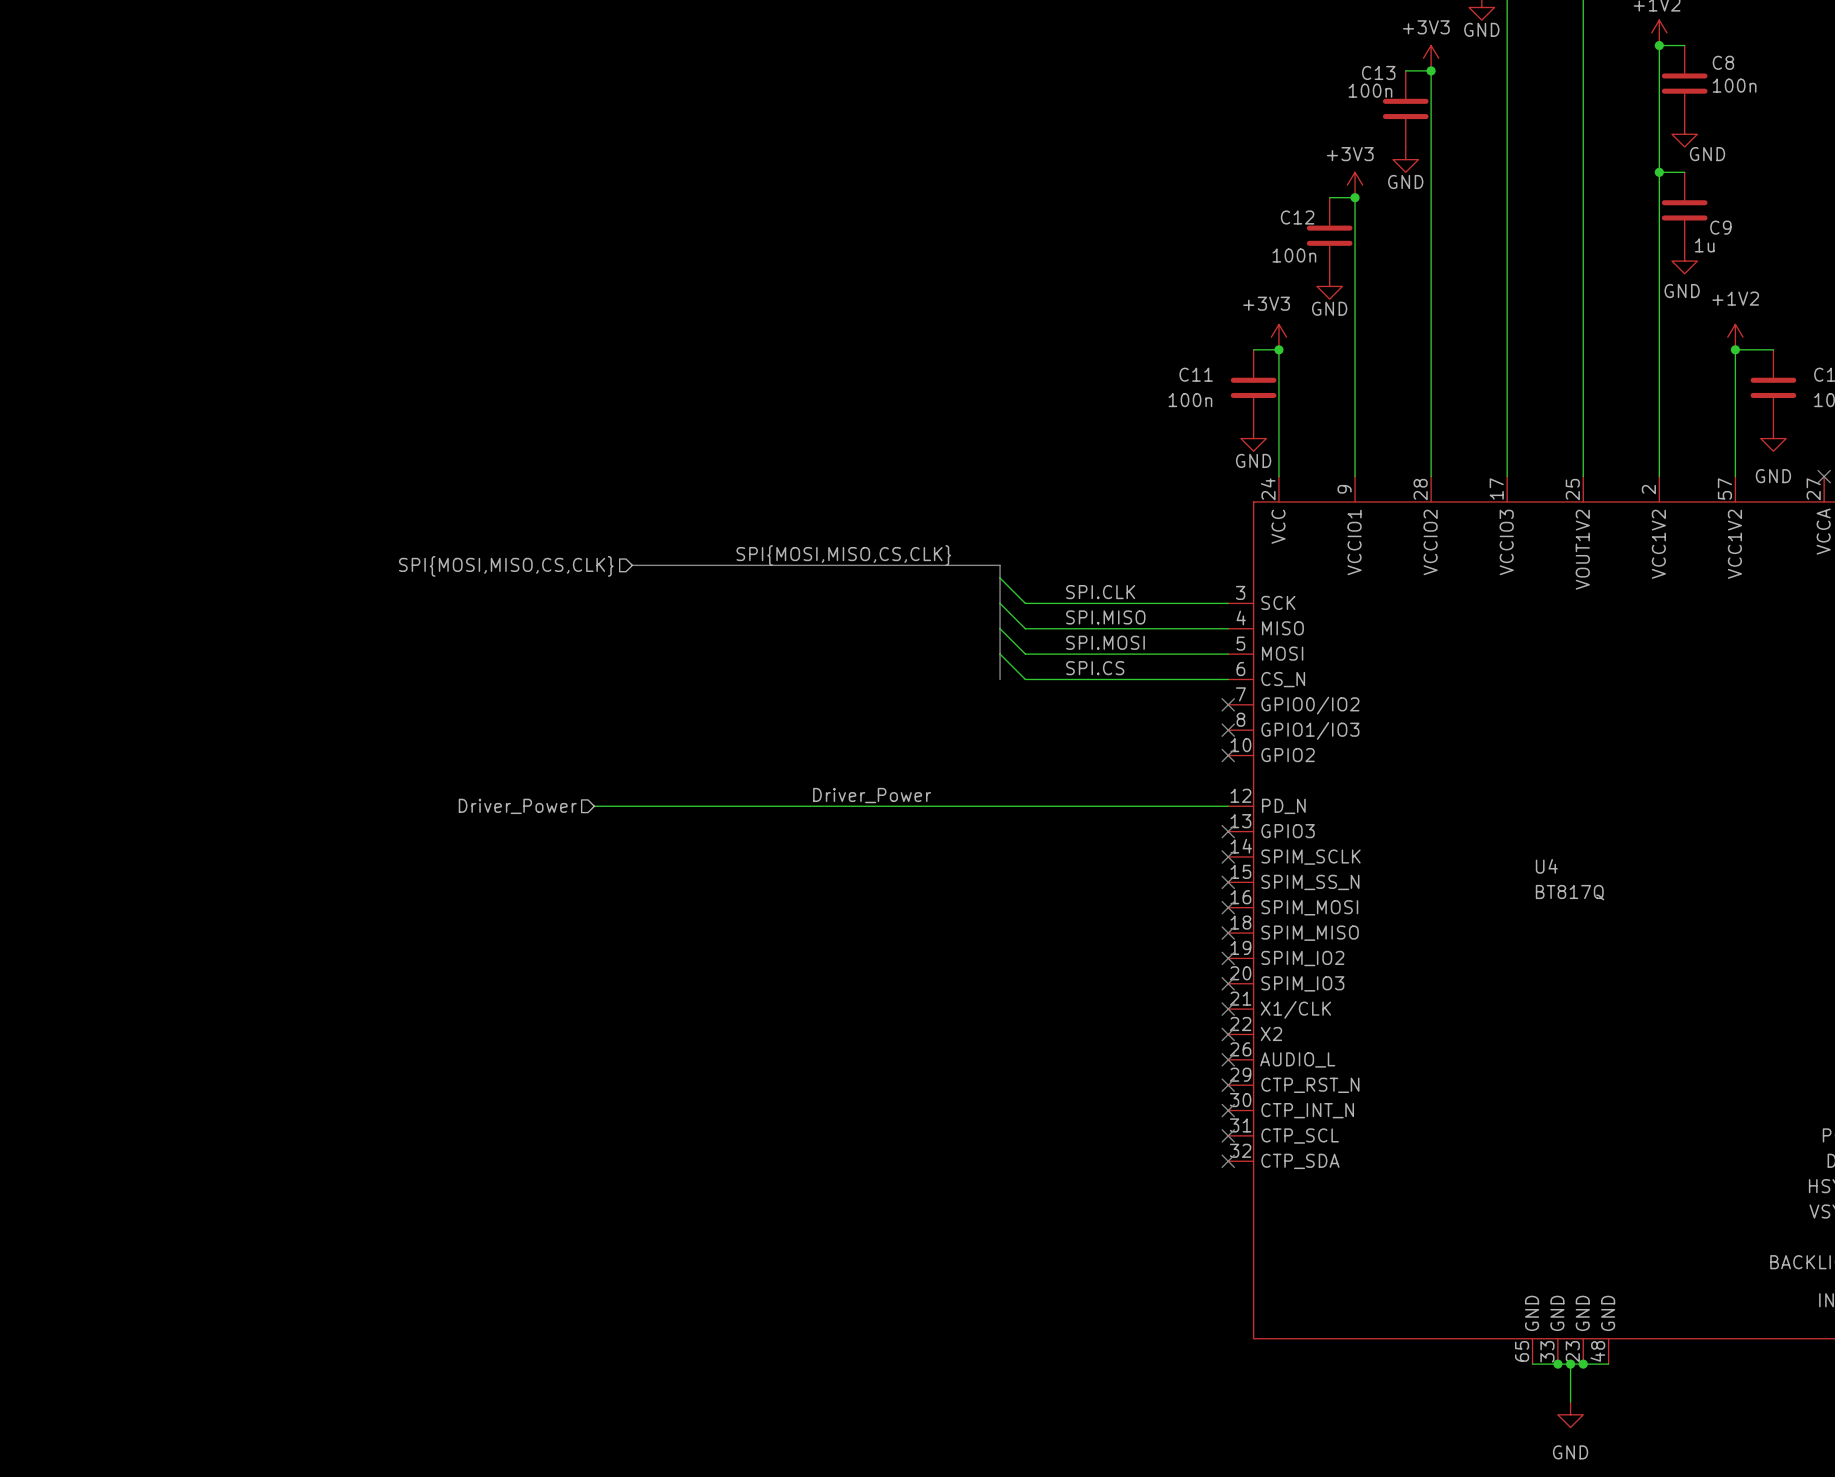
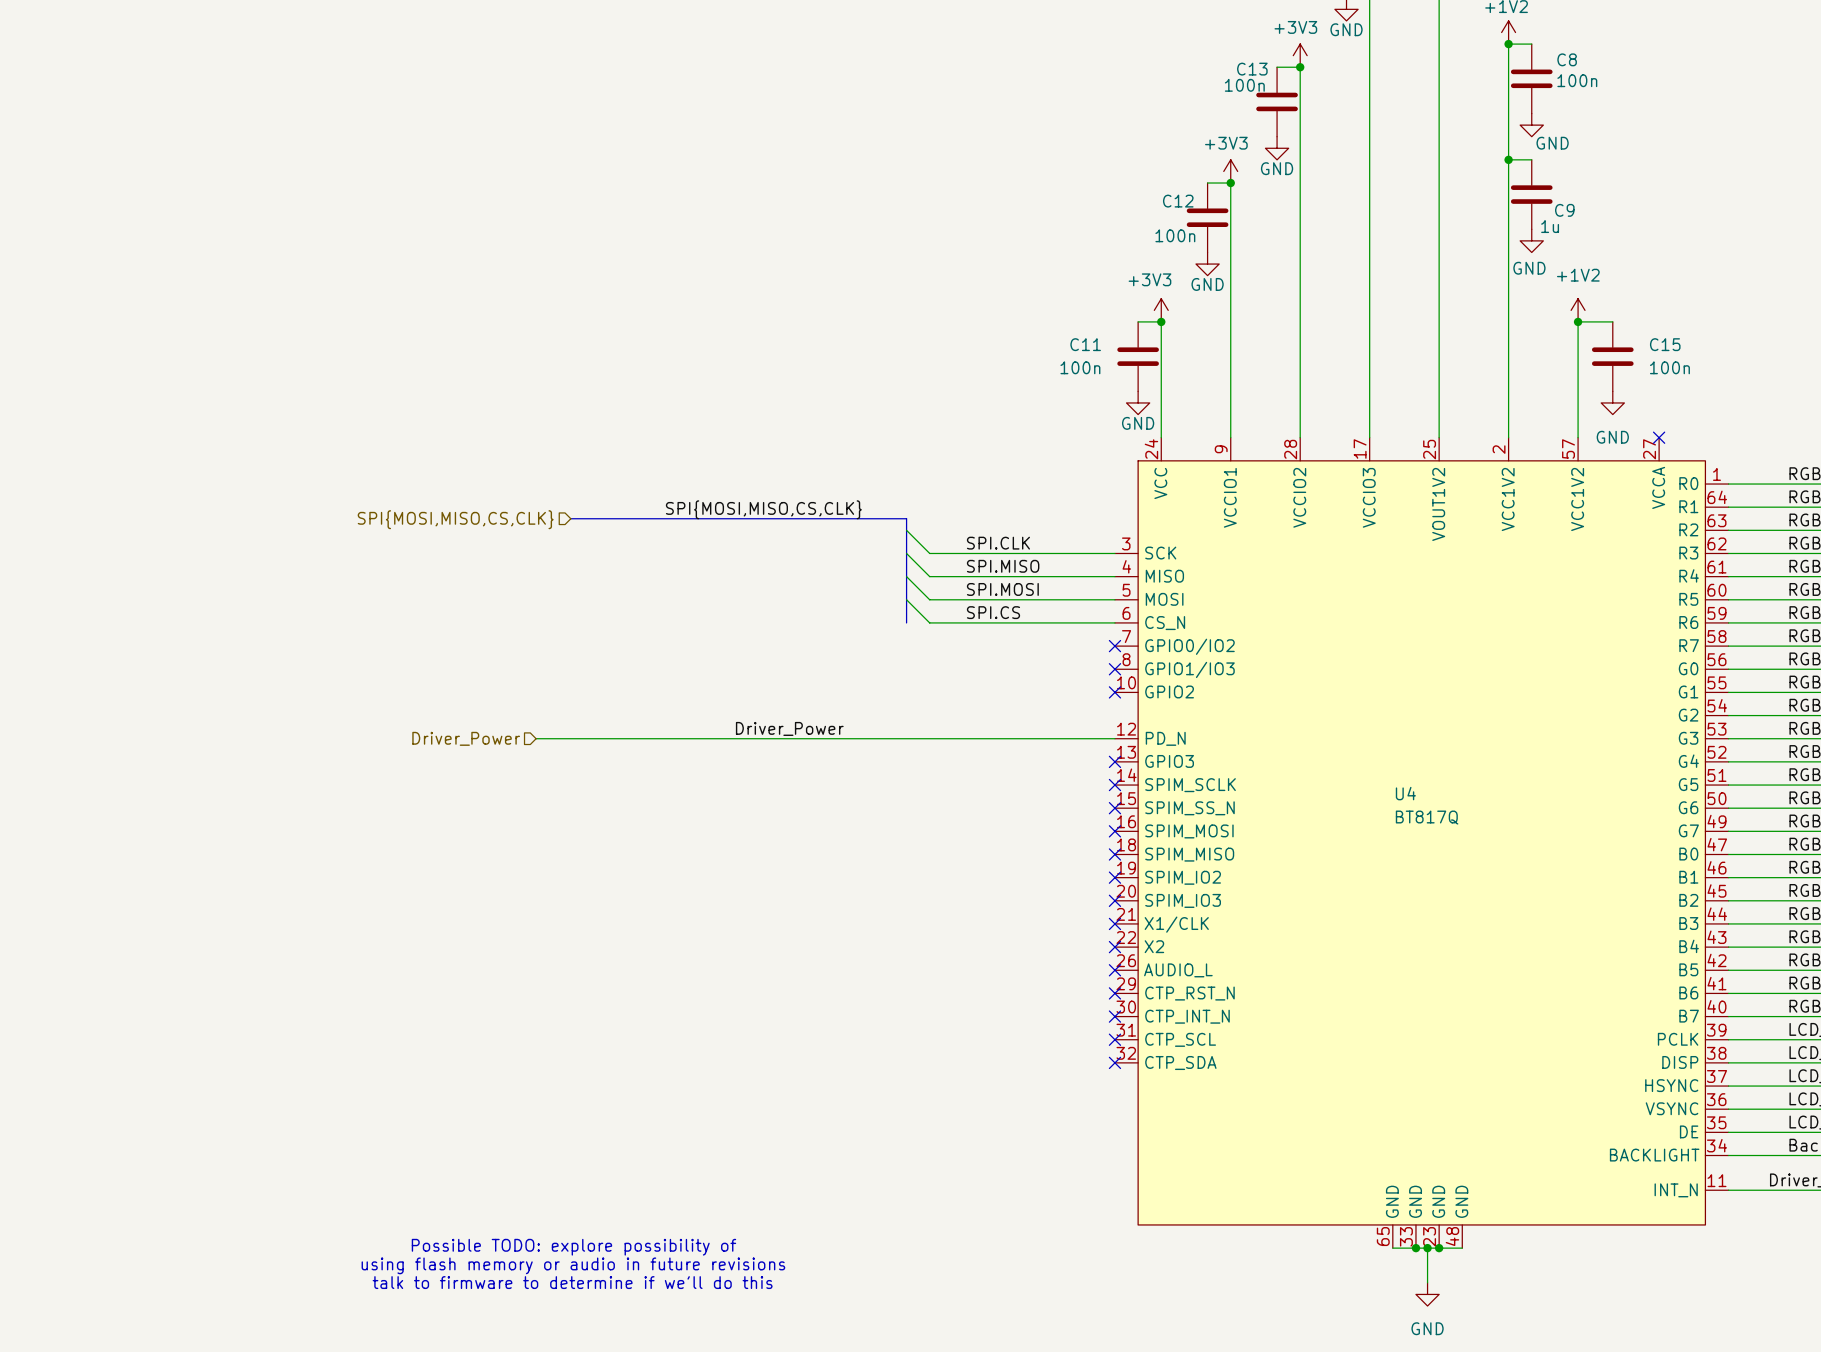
text: none -> Possible TODO: explore possibility of (573, 1247)
text: none -> using flash memory or audio in future revisions (573, 1265)
text: none -> talk to firmware to determine if we'll do this (572, 1282)

